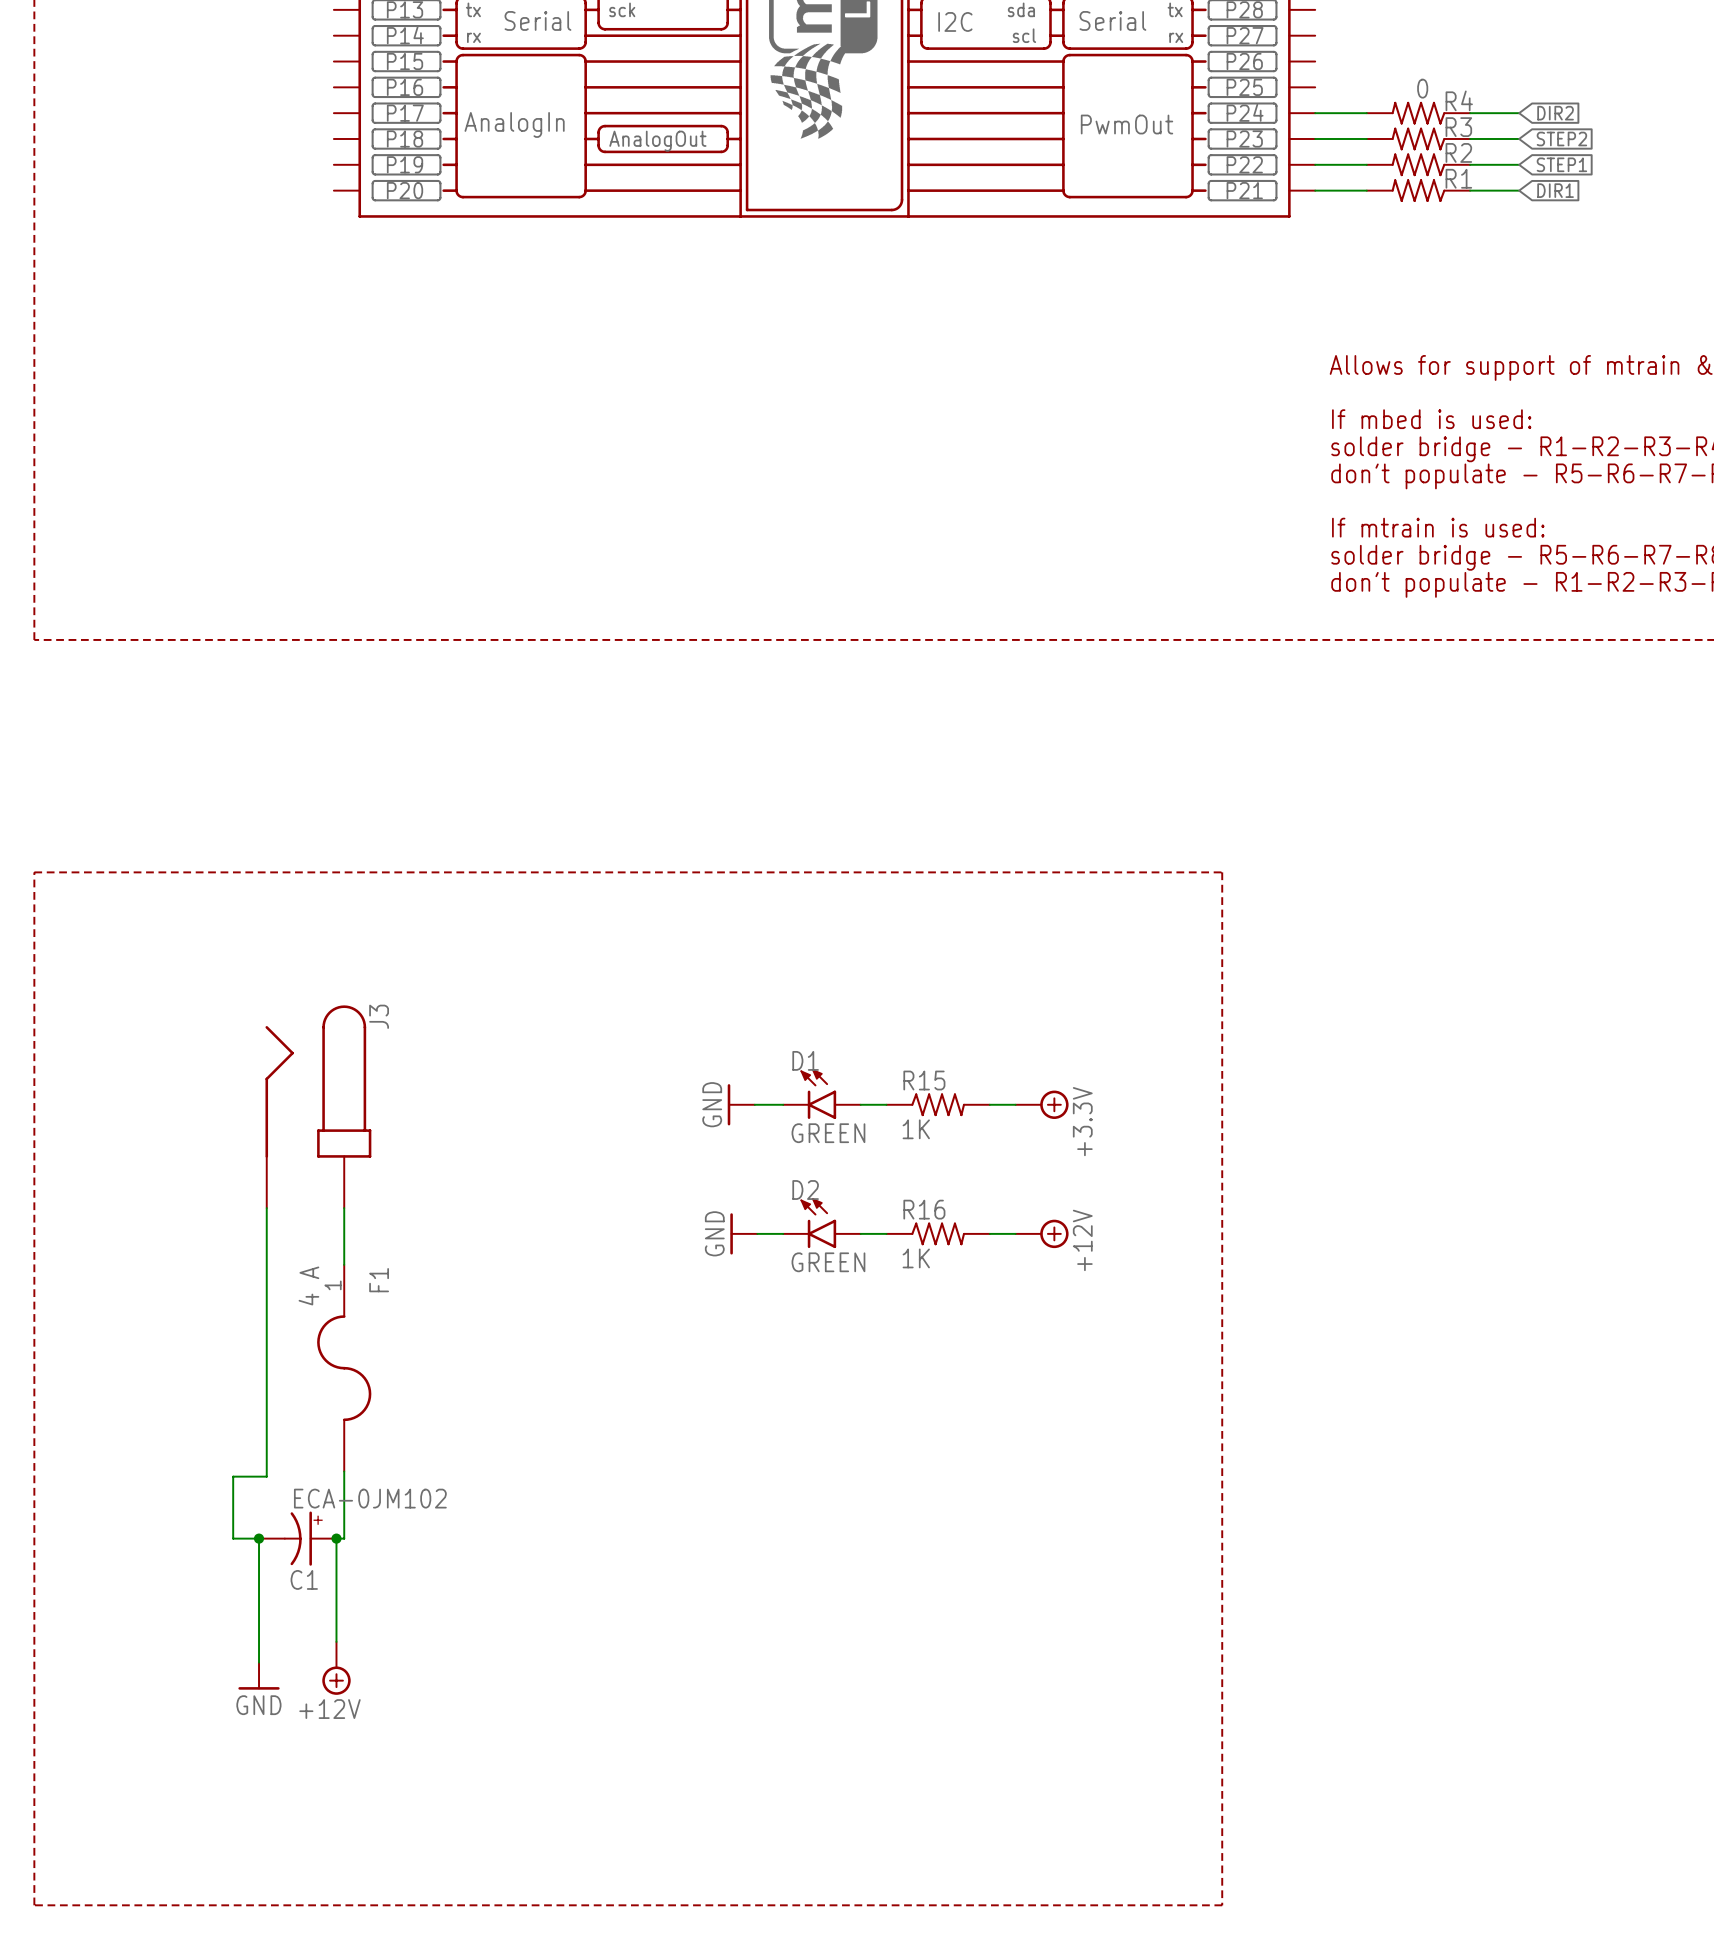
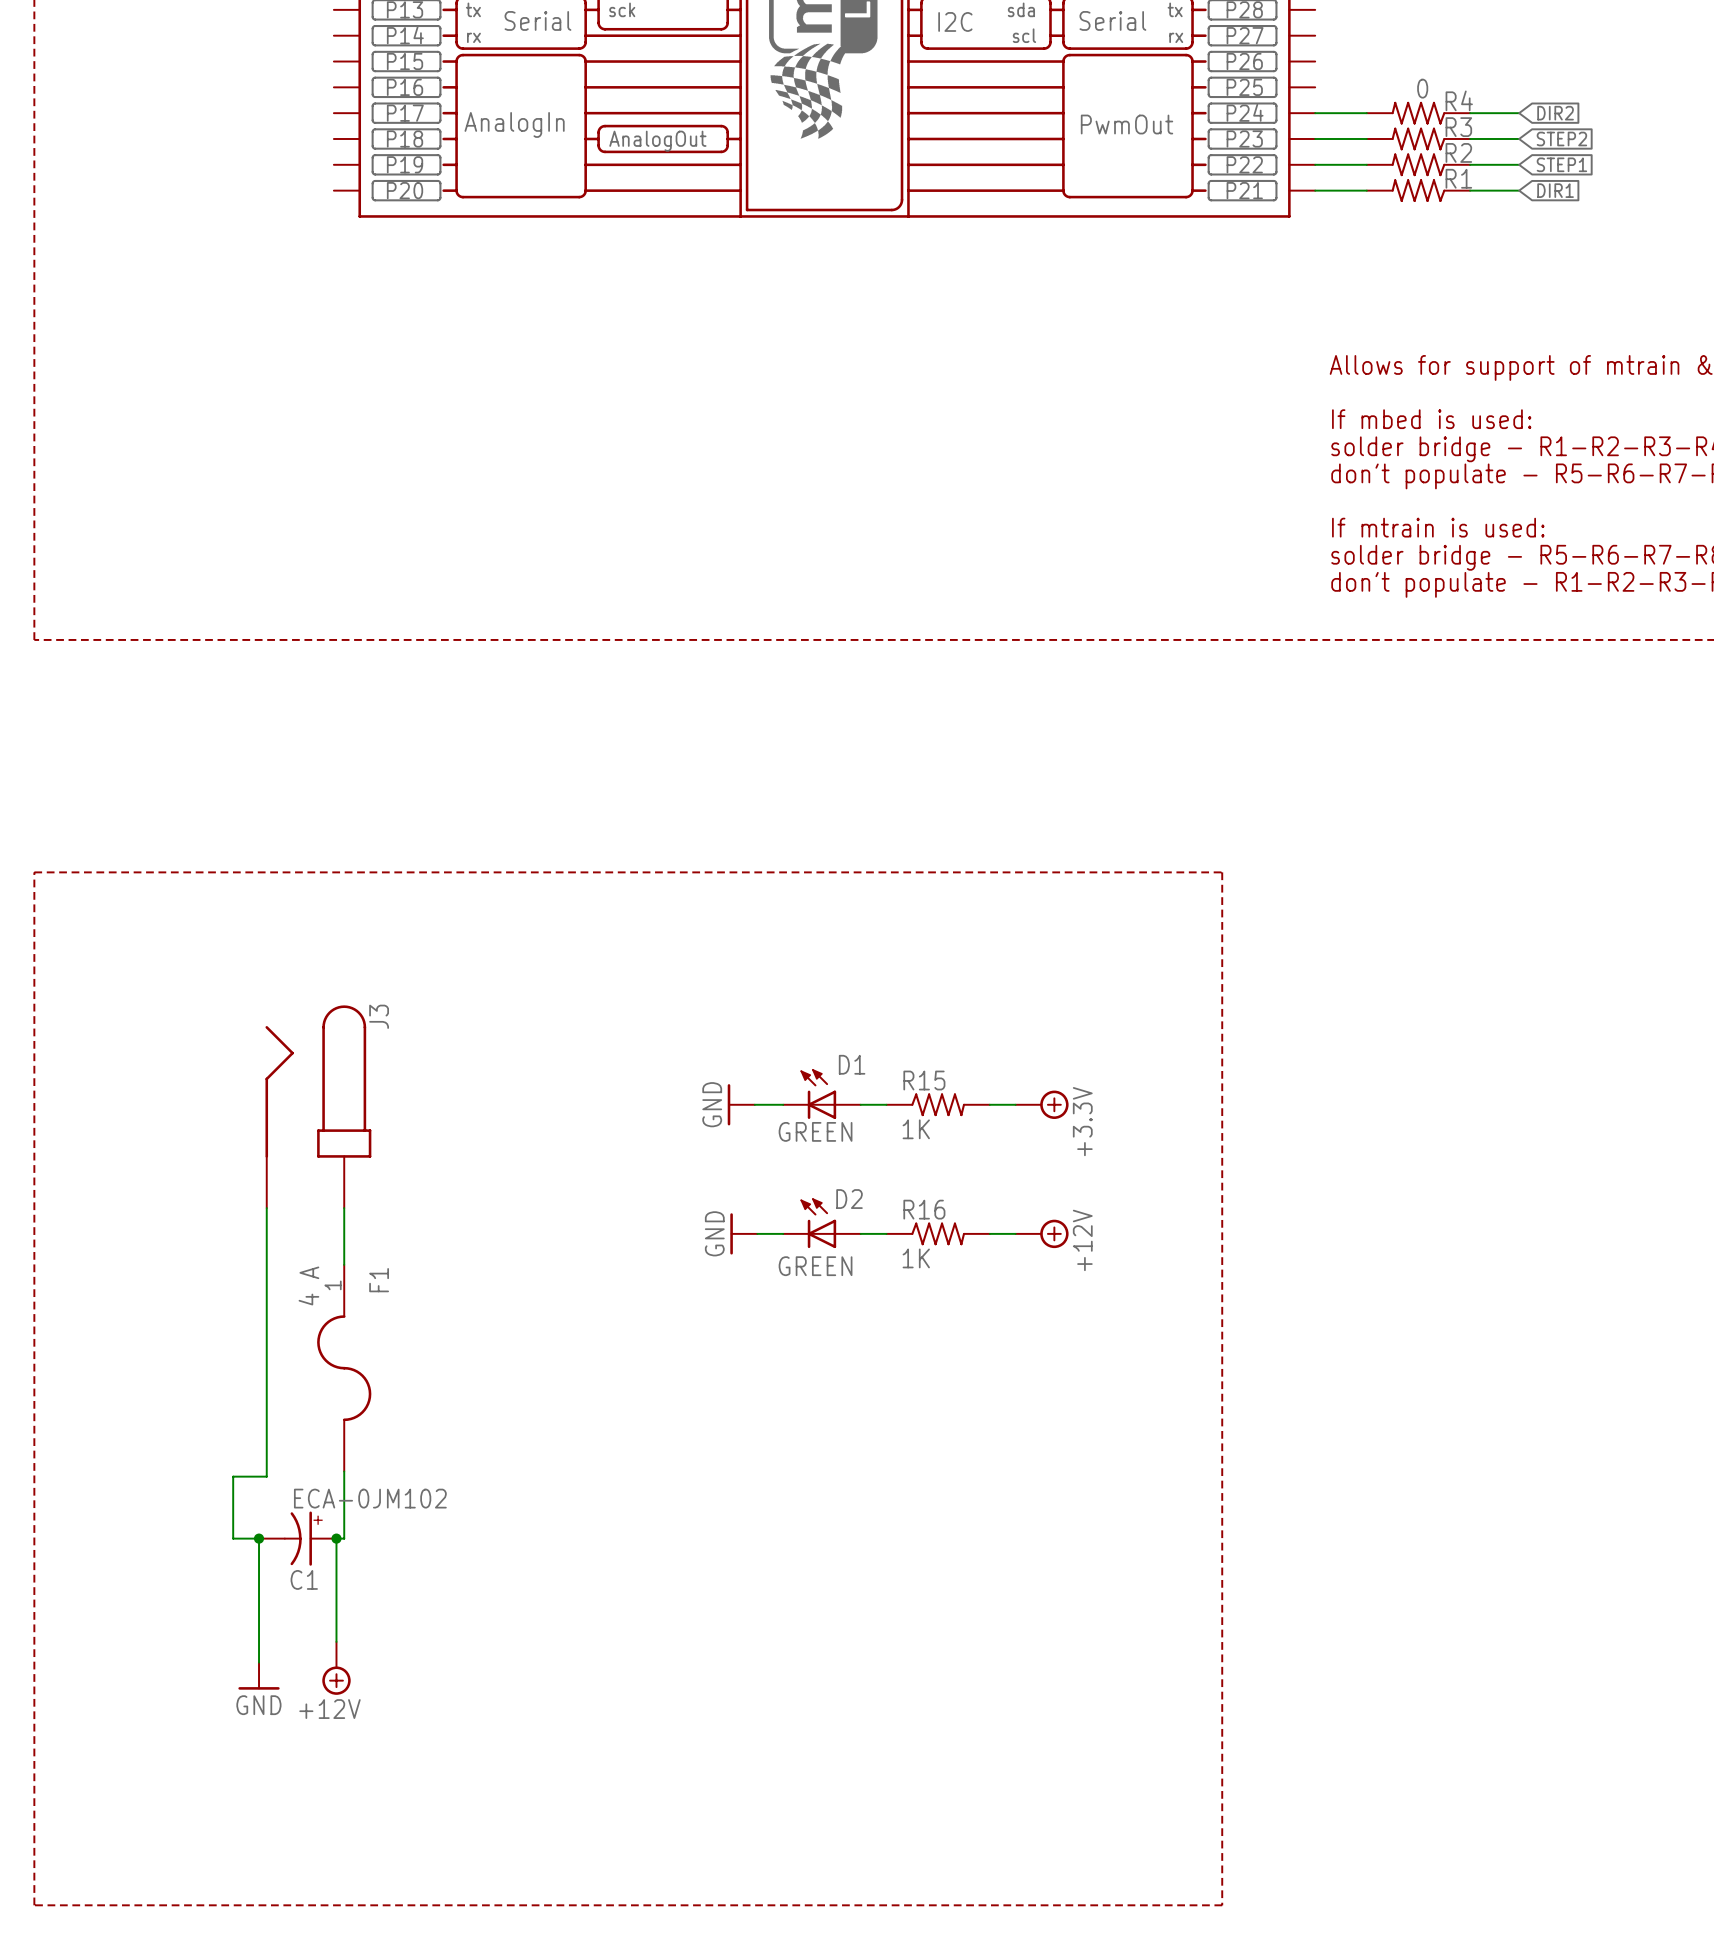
D1 name position: D1 (805, 1060) -> D1 (852, 1064)
D1 symbol: [783, 1069, 861, 1119] -> [783, 1069, 861, 1119]
D1 value position: GREEN (828, 1133) -> GREEN (815, 1131)
D2 name position: D2 (805, 1190) -> D2 (849, 1199)
D2 symbol: [783, 1198, 861, 1249] -> [783, 1198, 861, 1249]
D2 value position: GREEN (828, 1262) -> GREEN (815, 1266)

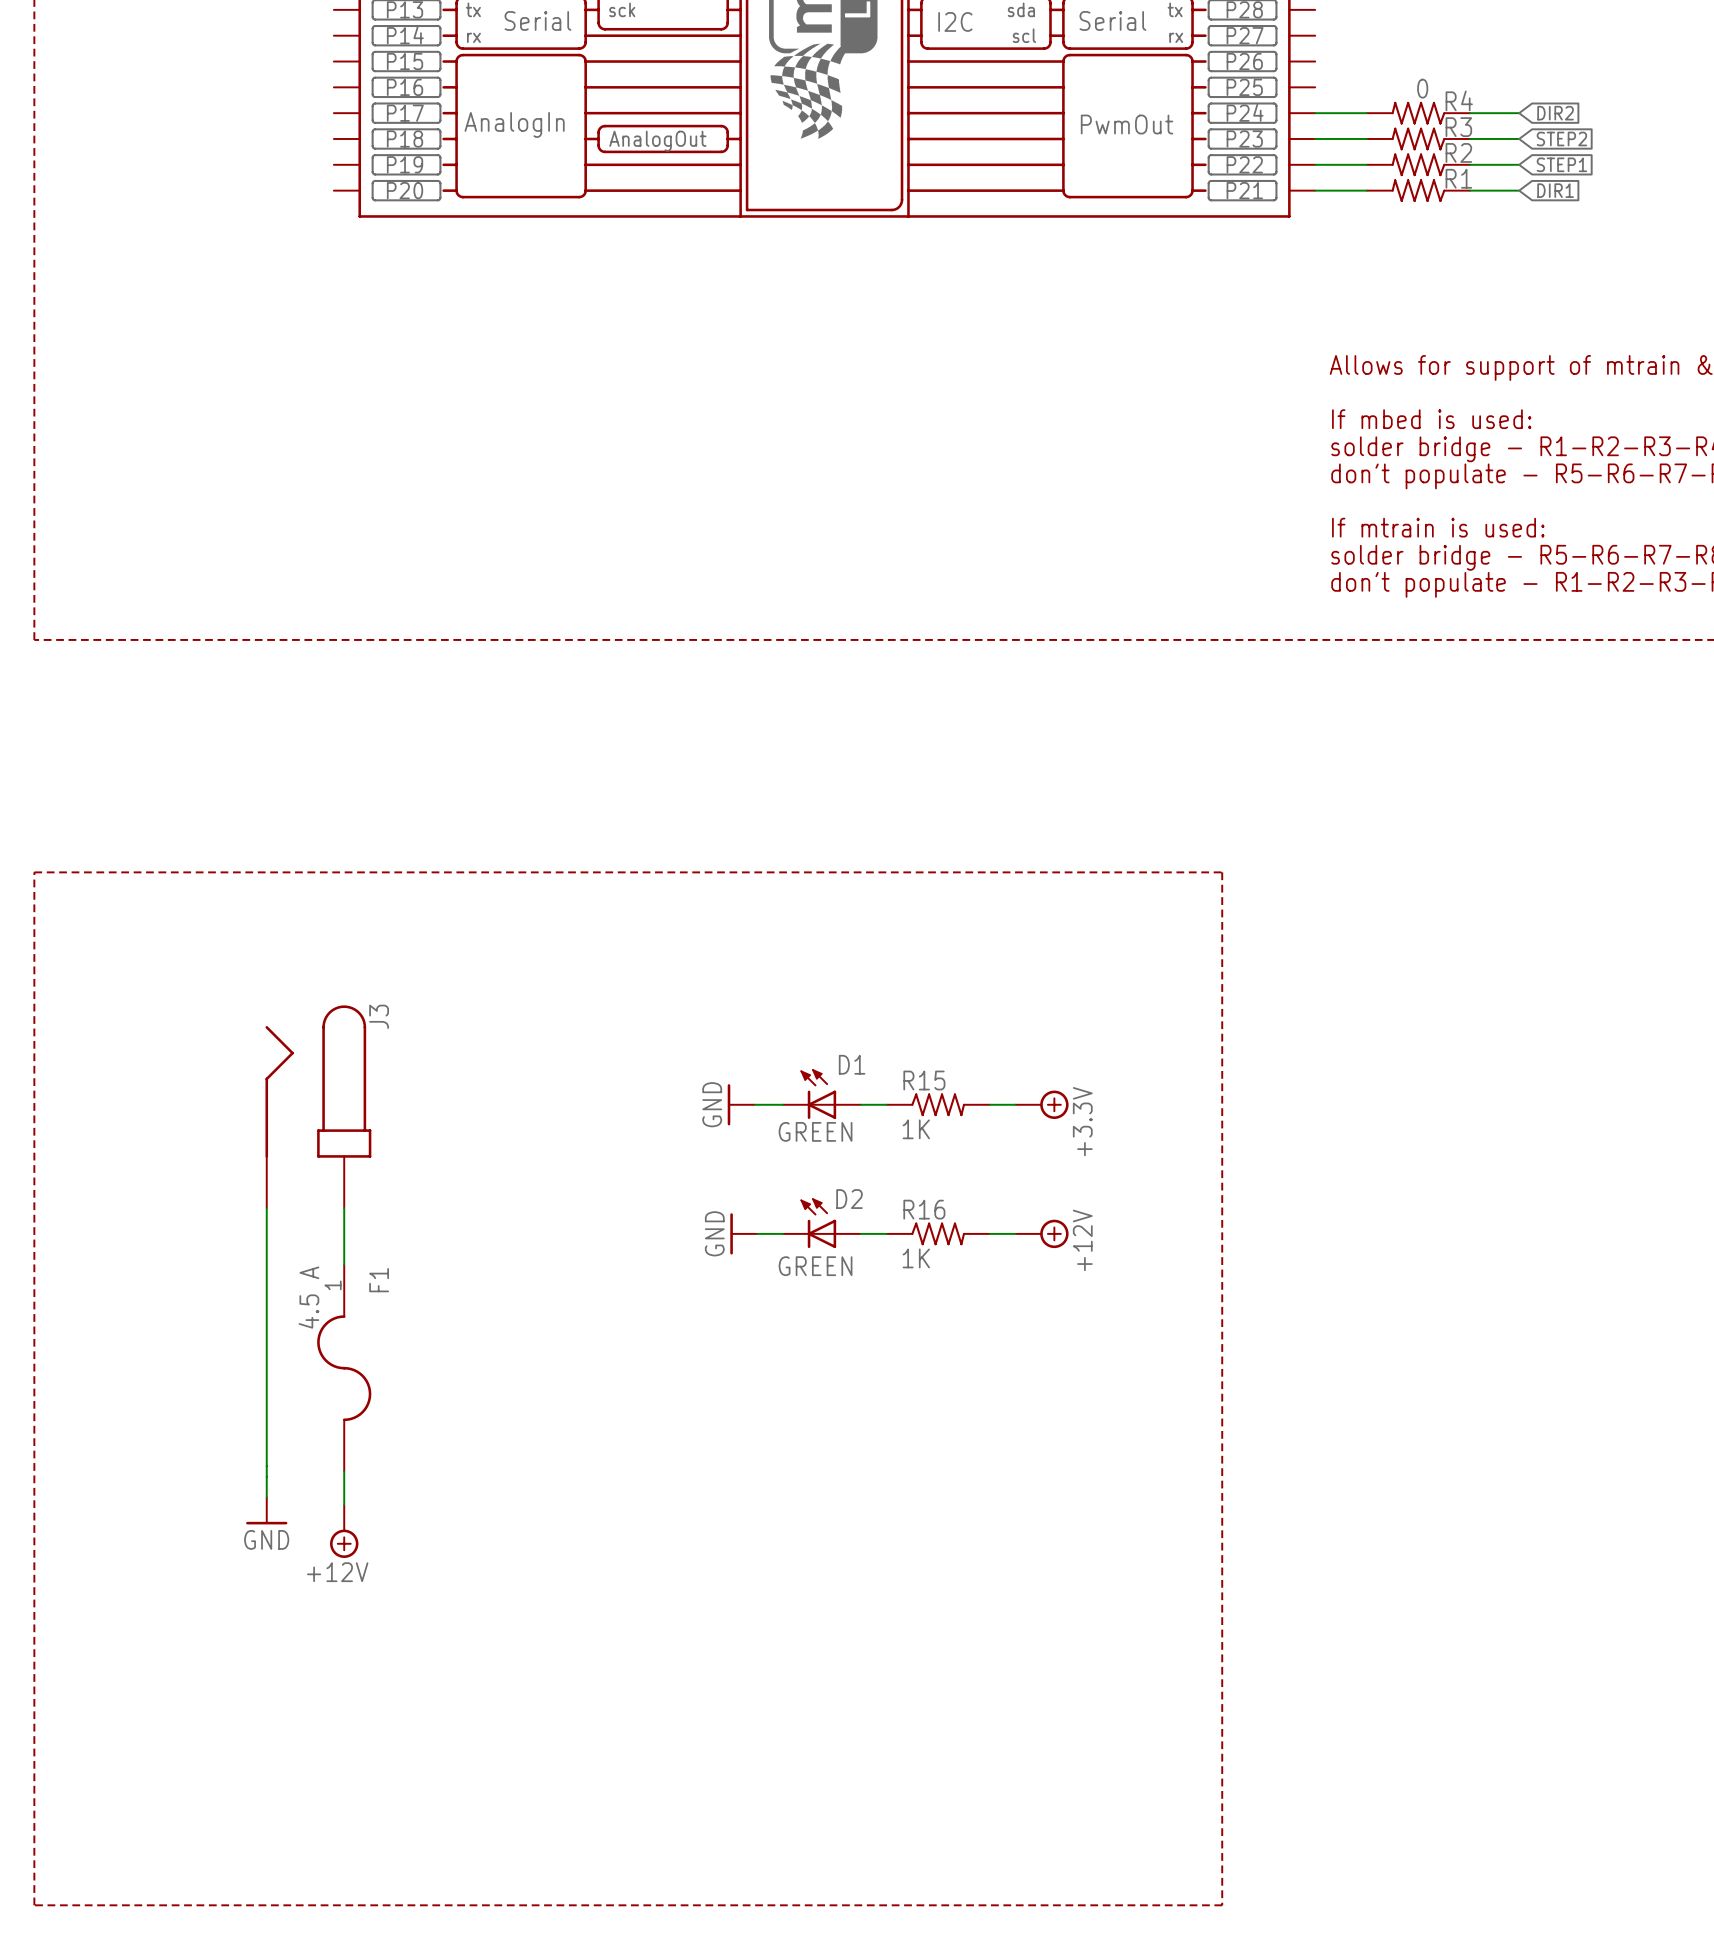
F1 value: 4 A (308, 1285) -> 4.5 A (308, 1297)
wire: (266, 1476) (233, 1476) (233, 1538) (259, 1538) (259, 1662) -> (266, 1476) (266, 1497)
wire: (344, 1505) (344, 1538) (336, 1538) (336, 1641) -> none
junction: (259, 1538) -> none
C1: ECA-0JM102 (297, 1538) -> none
junction: (336, 1538) -> none
power symbol position: +12V (336, 1668) -> +12V (344, 1531)
power symbol position: GND (259, 1676) -> GND (266, 1510)

